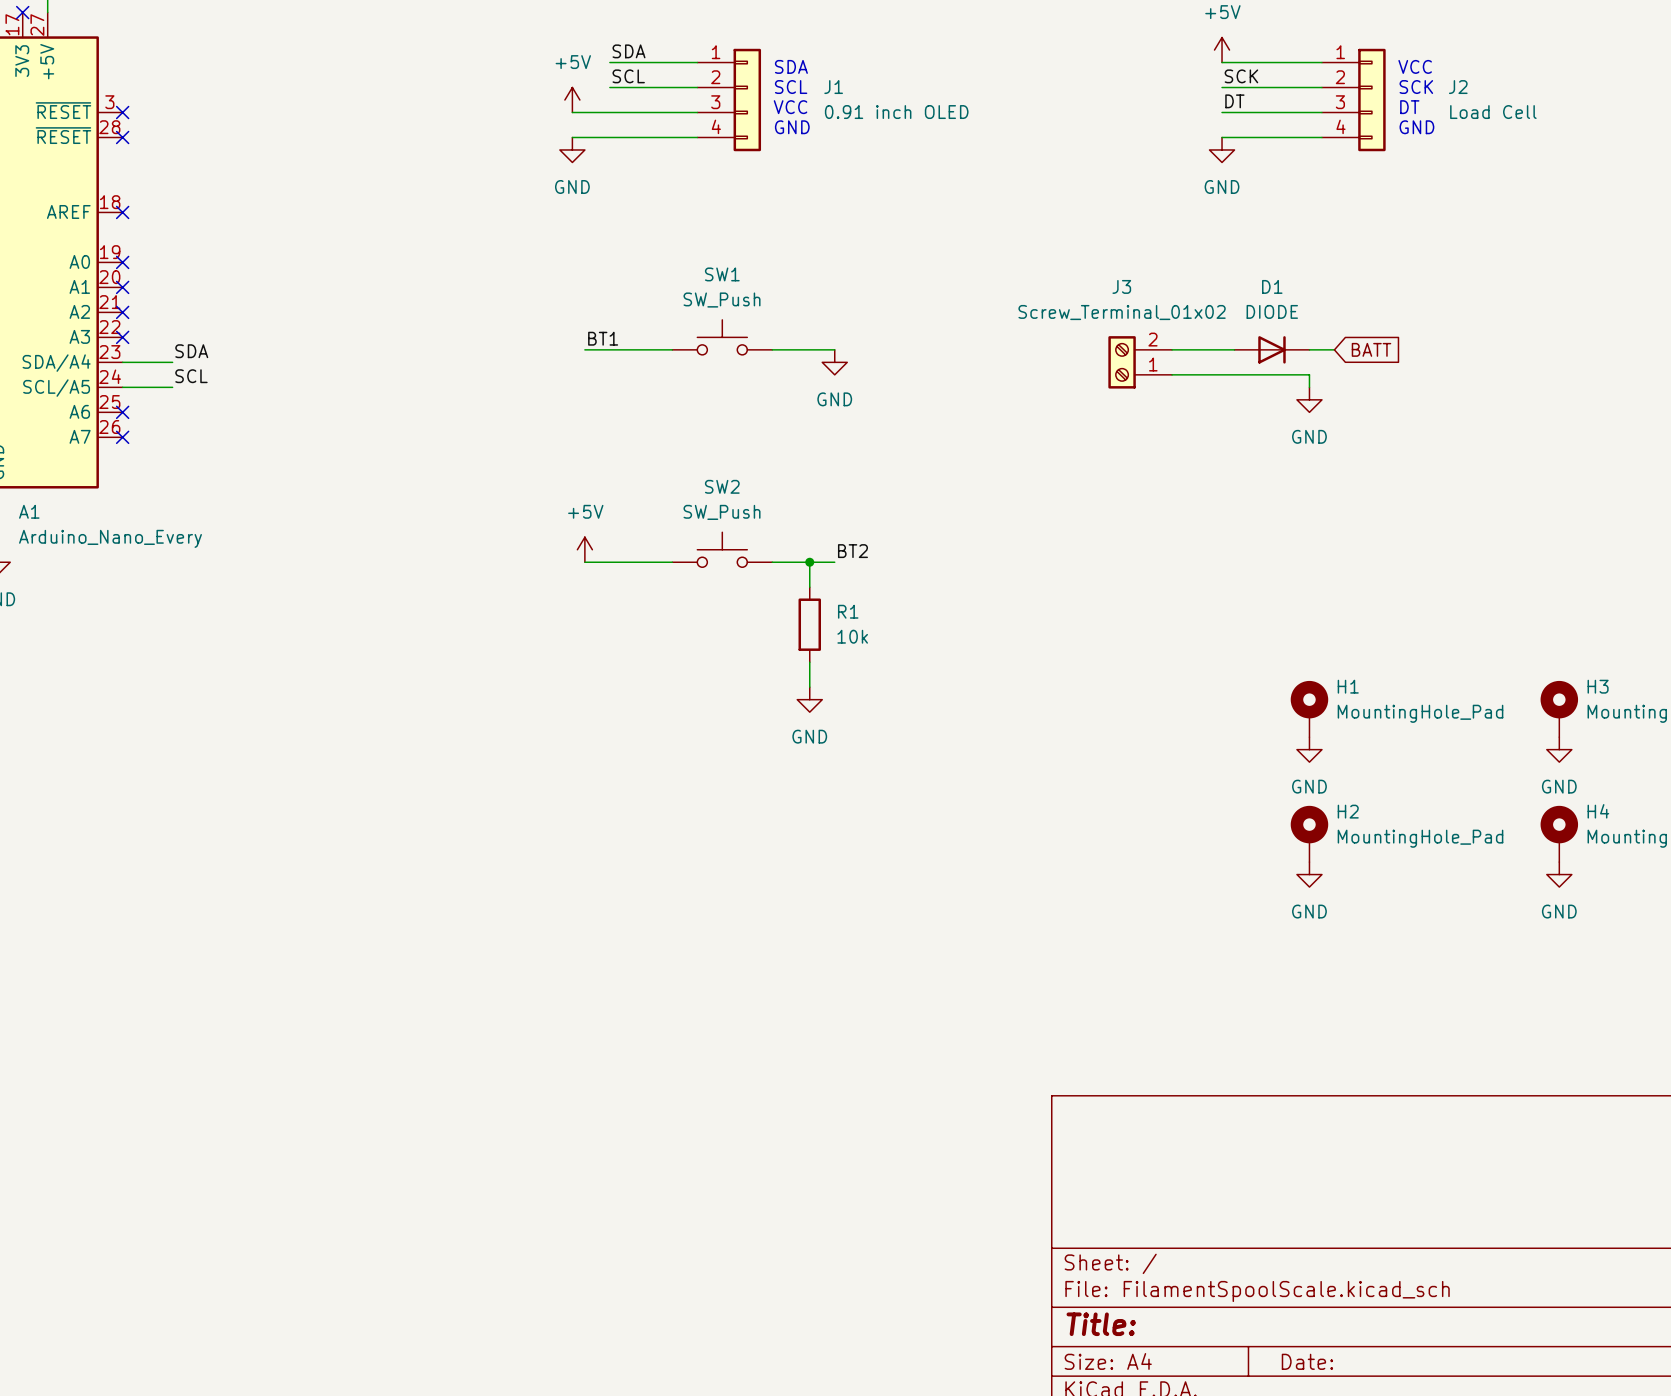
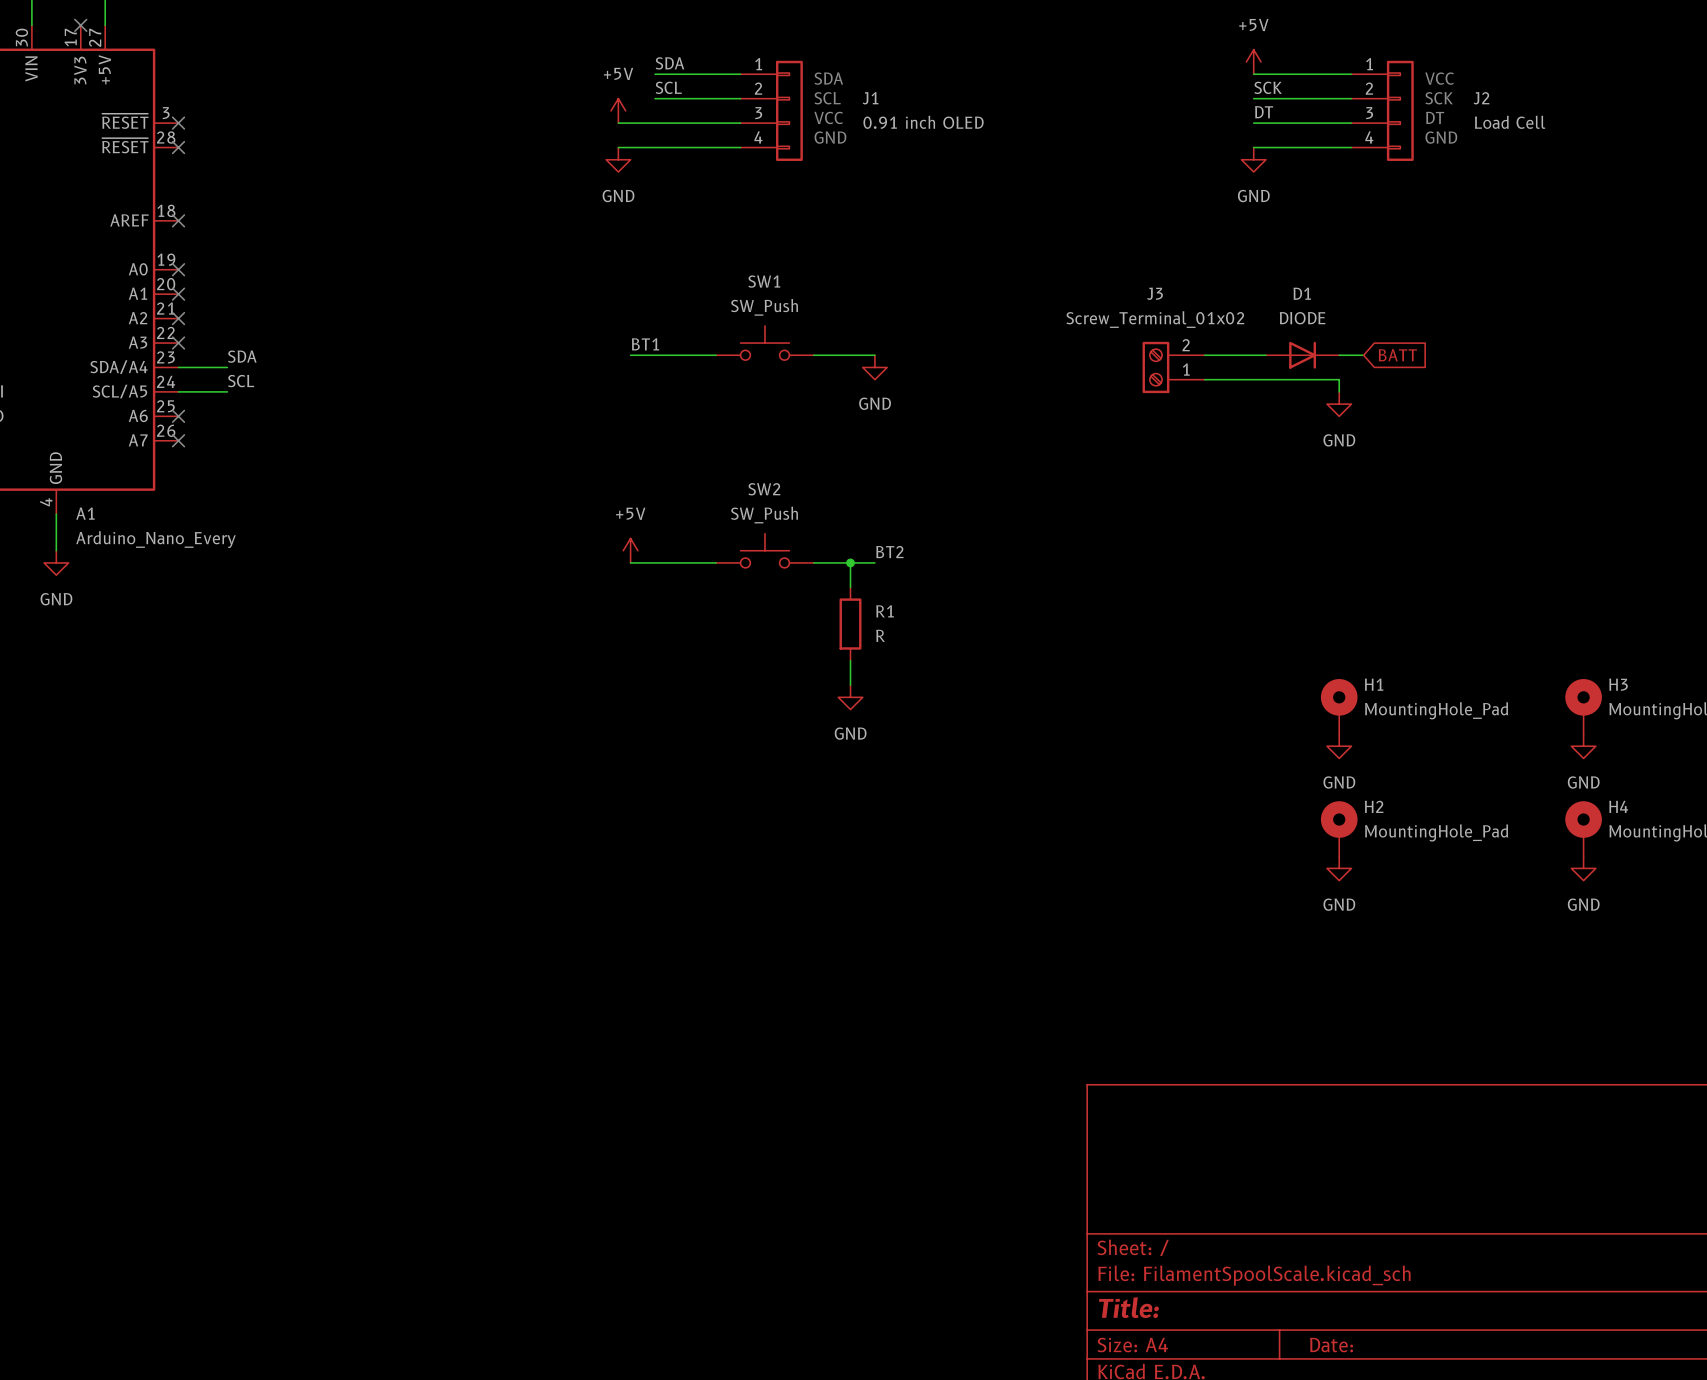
R1 value: 10k (852, 636) -> R (880, 635)

